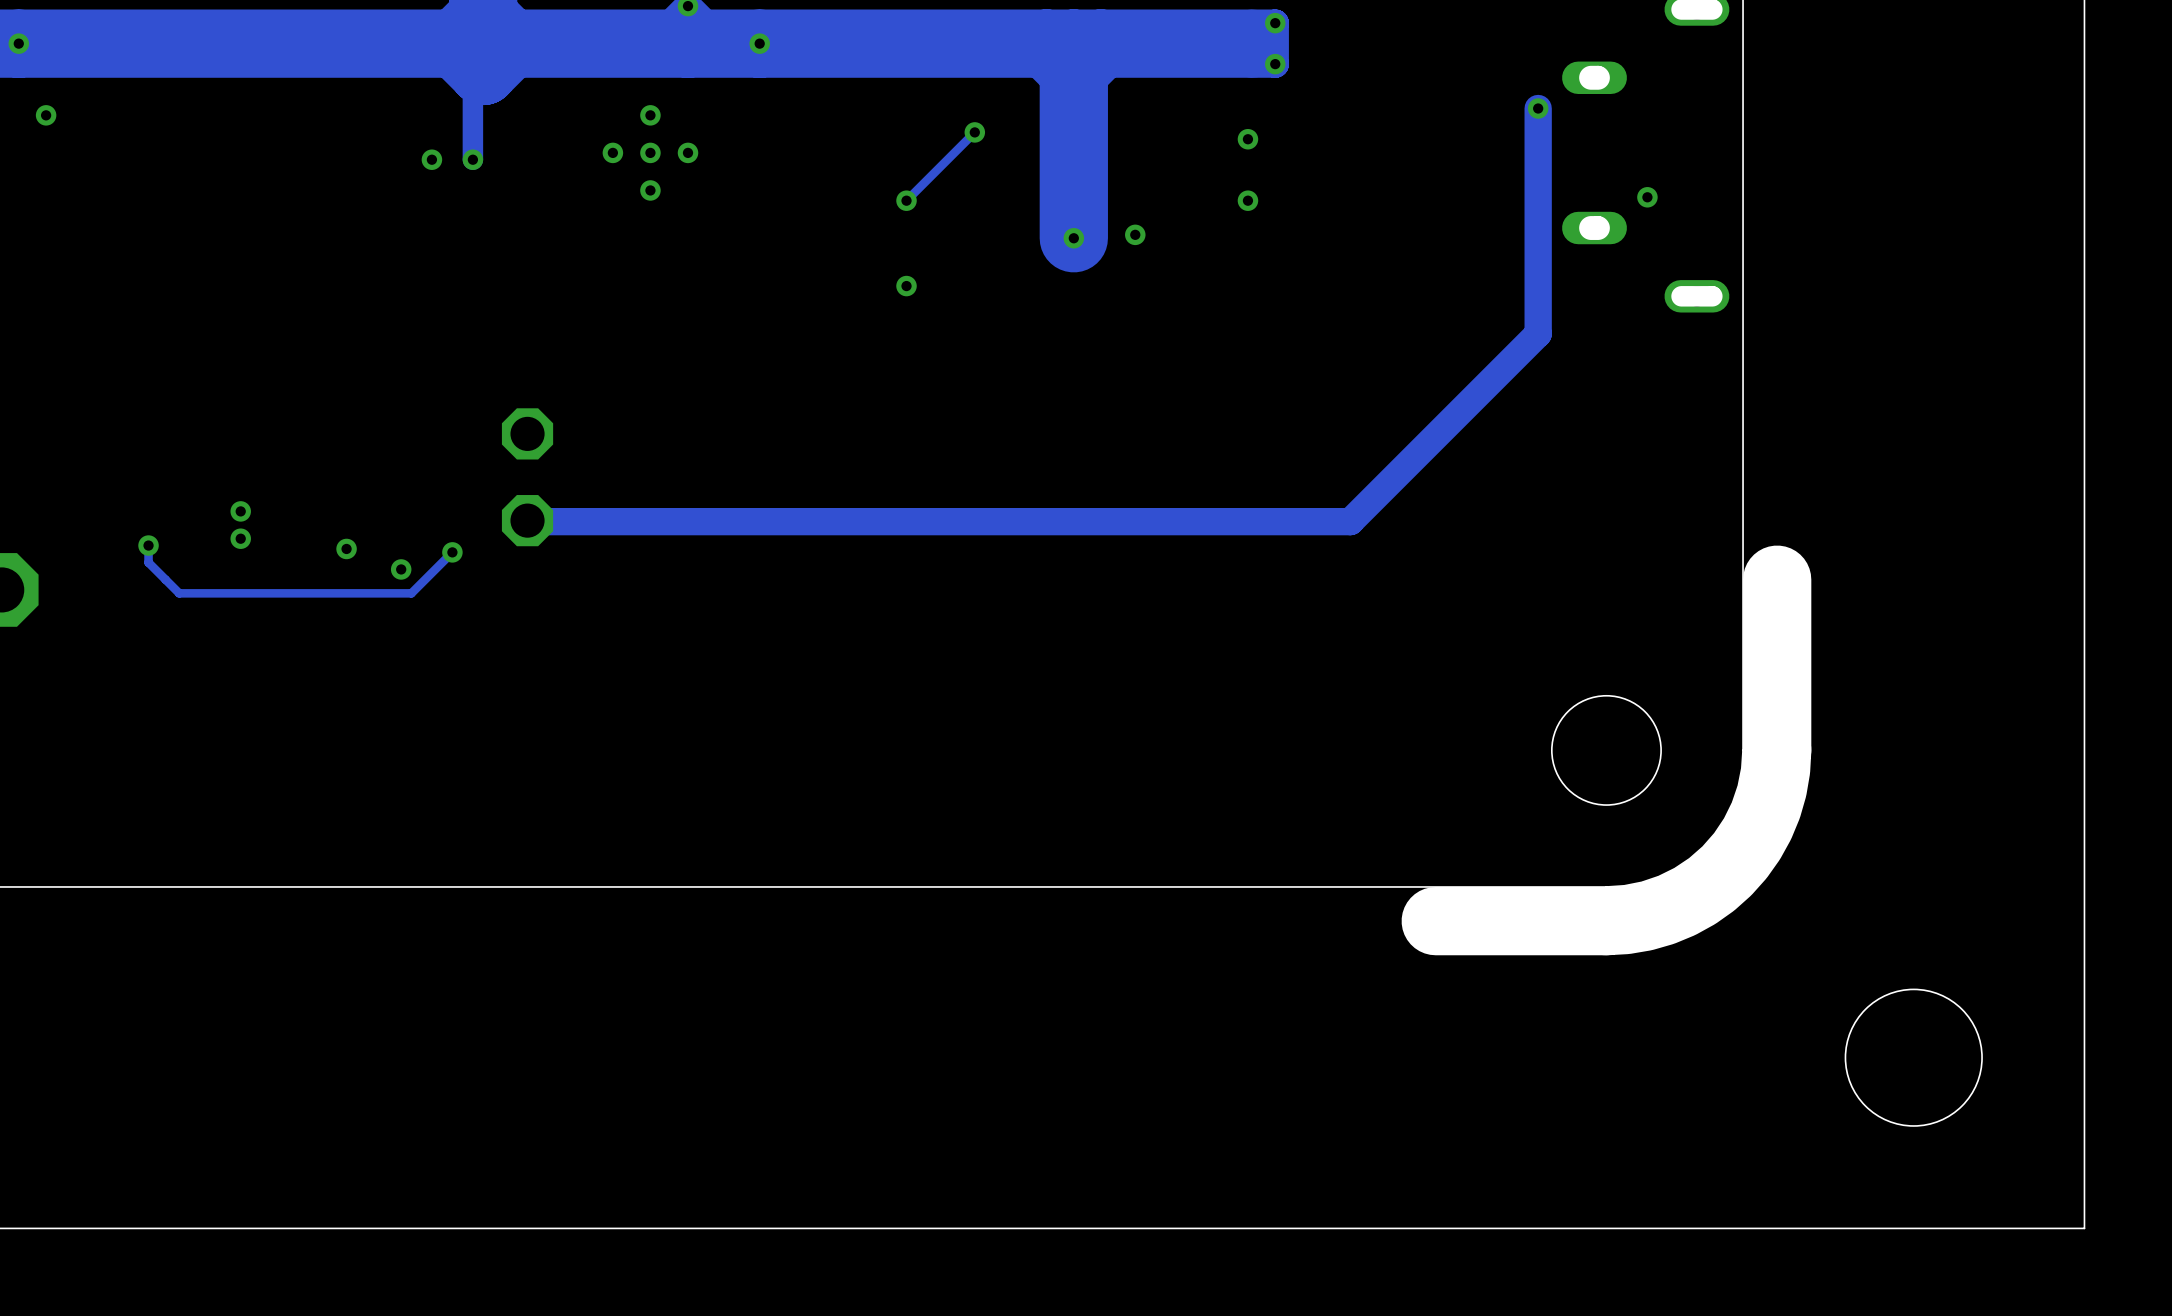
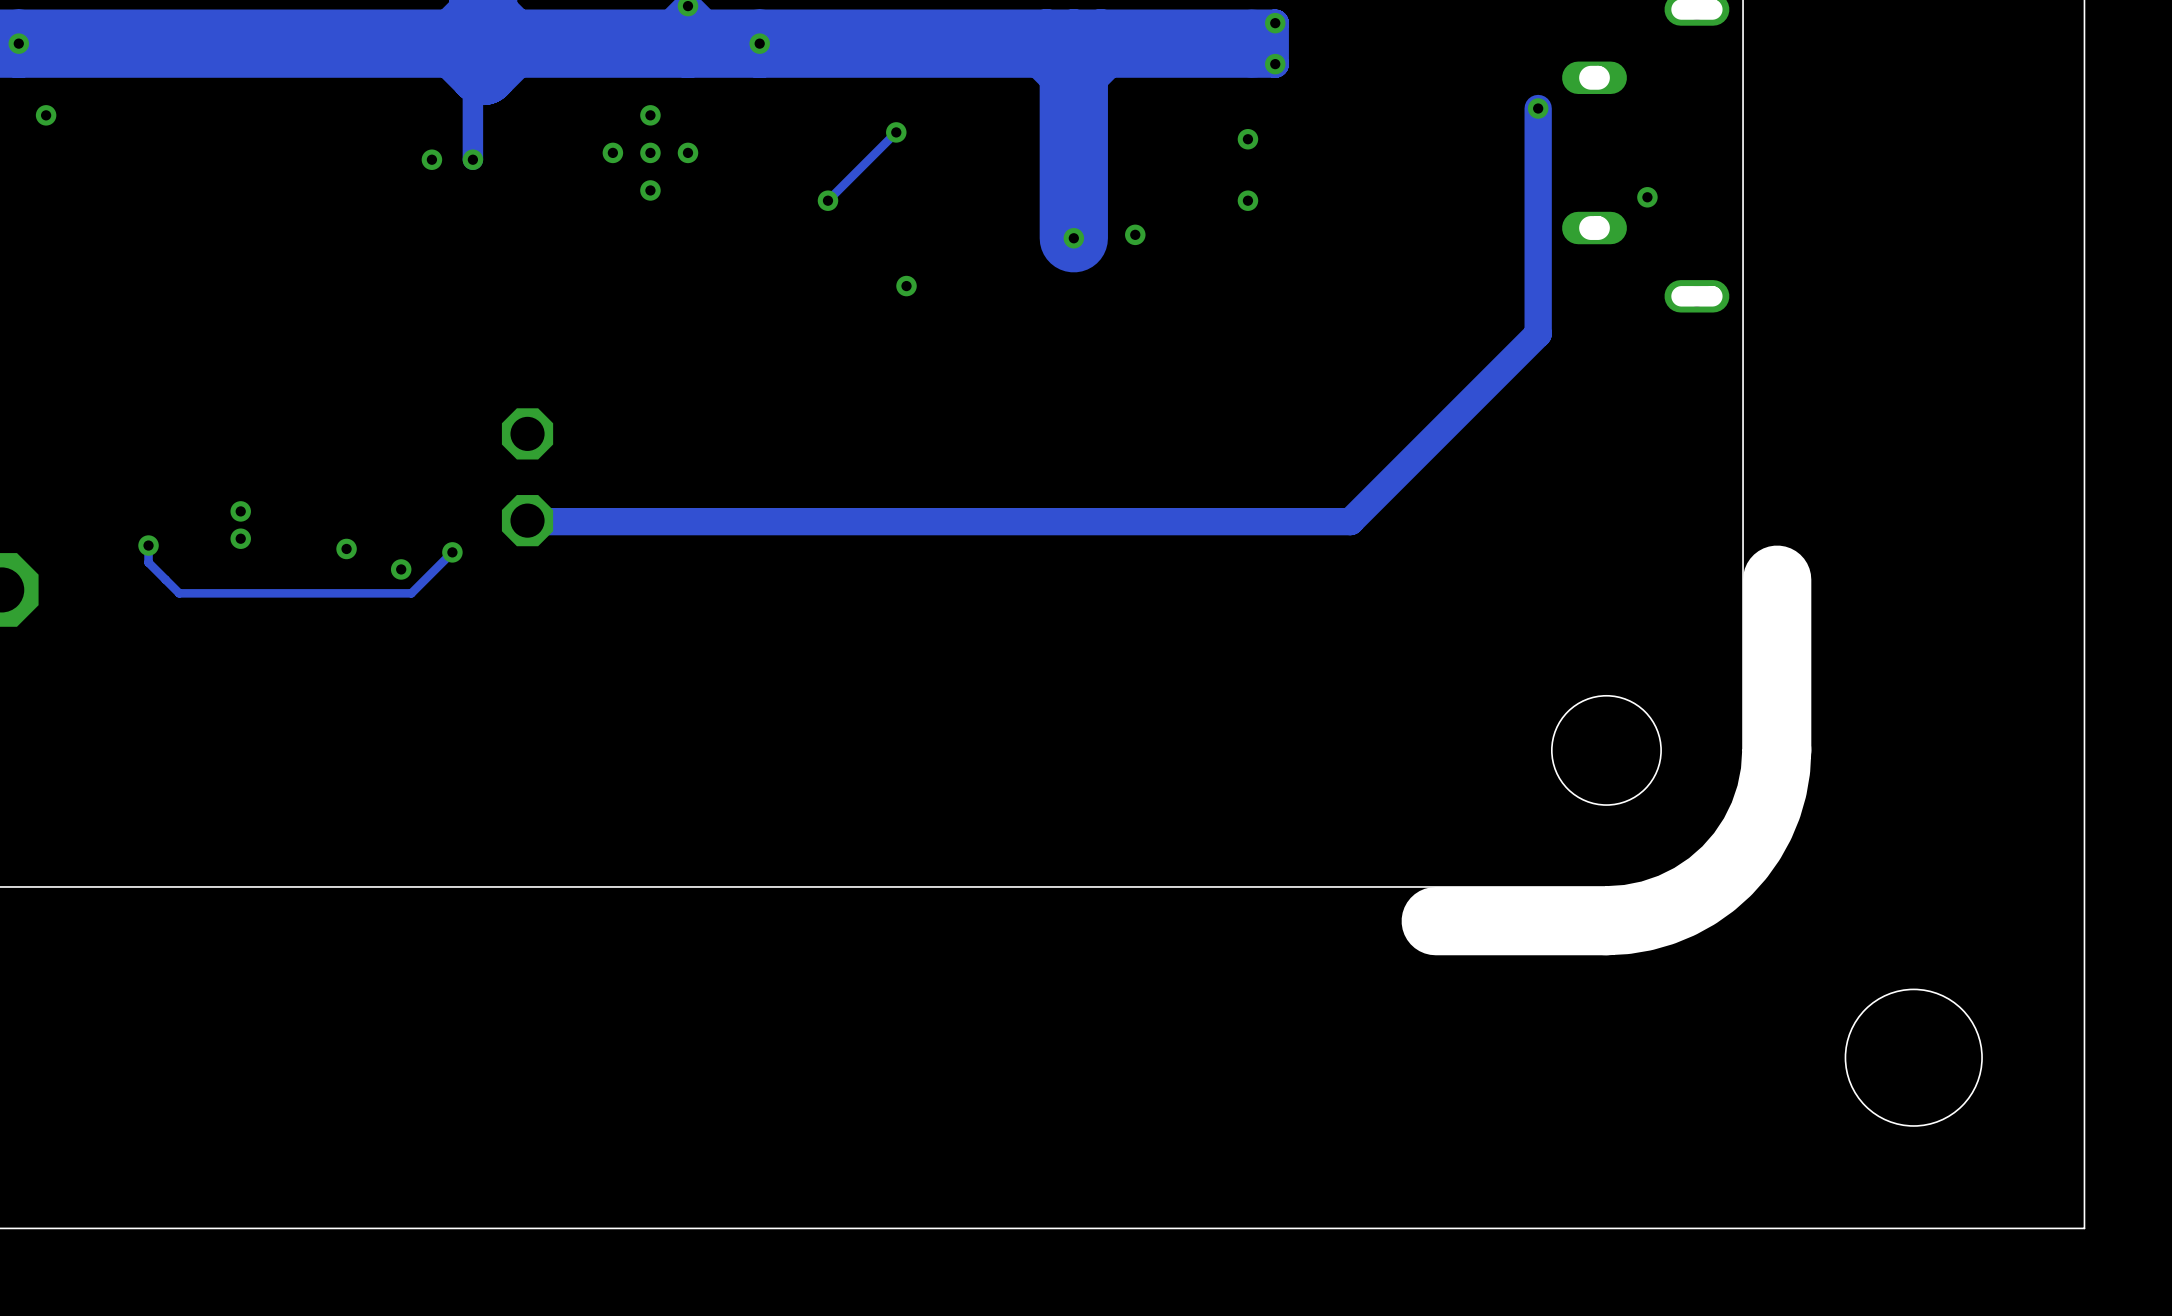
via: none -> (896, 132)
track: (974, 132) (906, 200) -> (896, 132) (827, 200)
via: (974, 132) -> none
via: none -> (827, 200)
via: (906, 200) -> none

